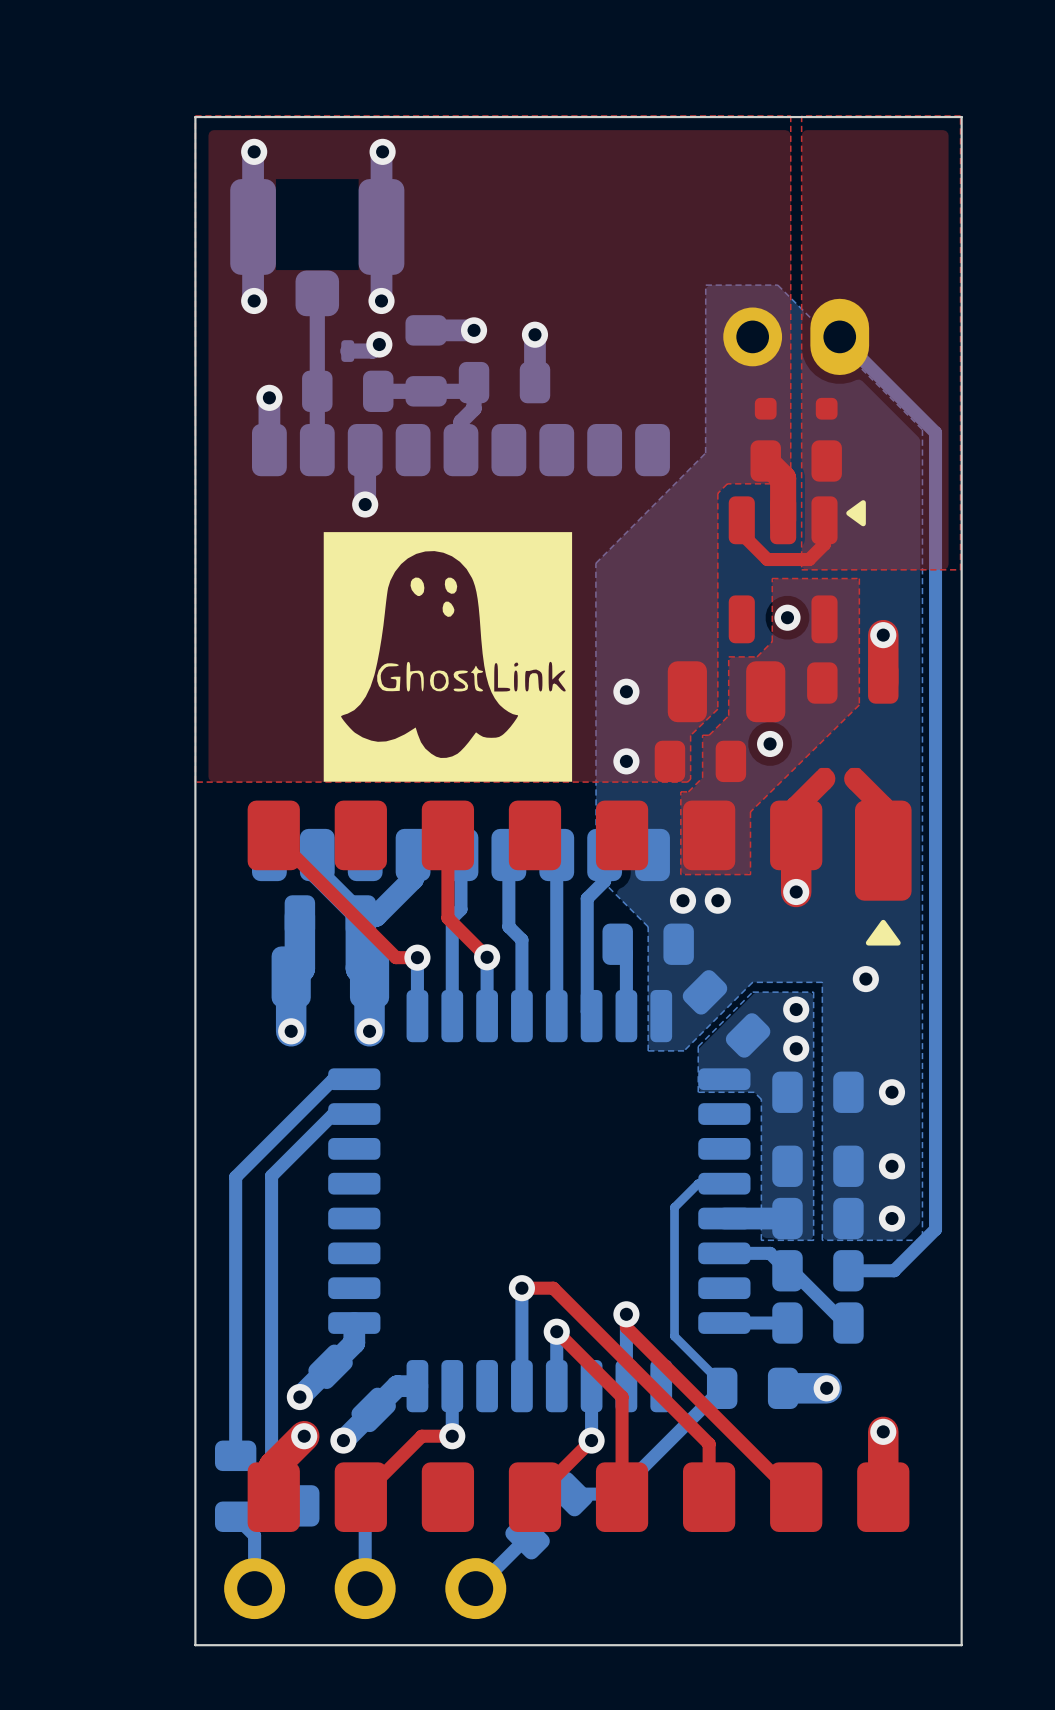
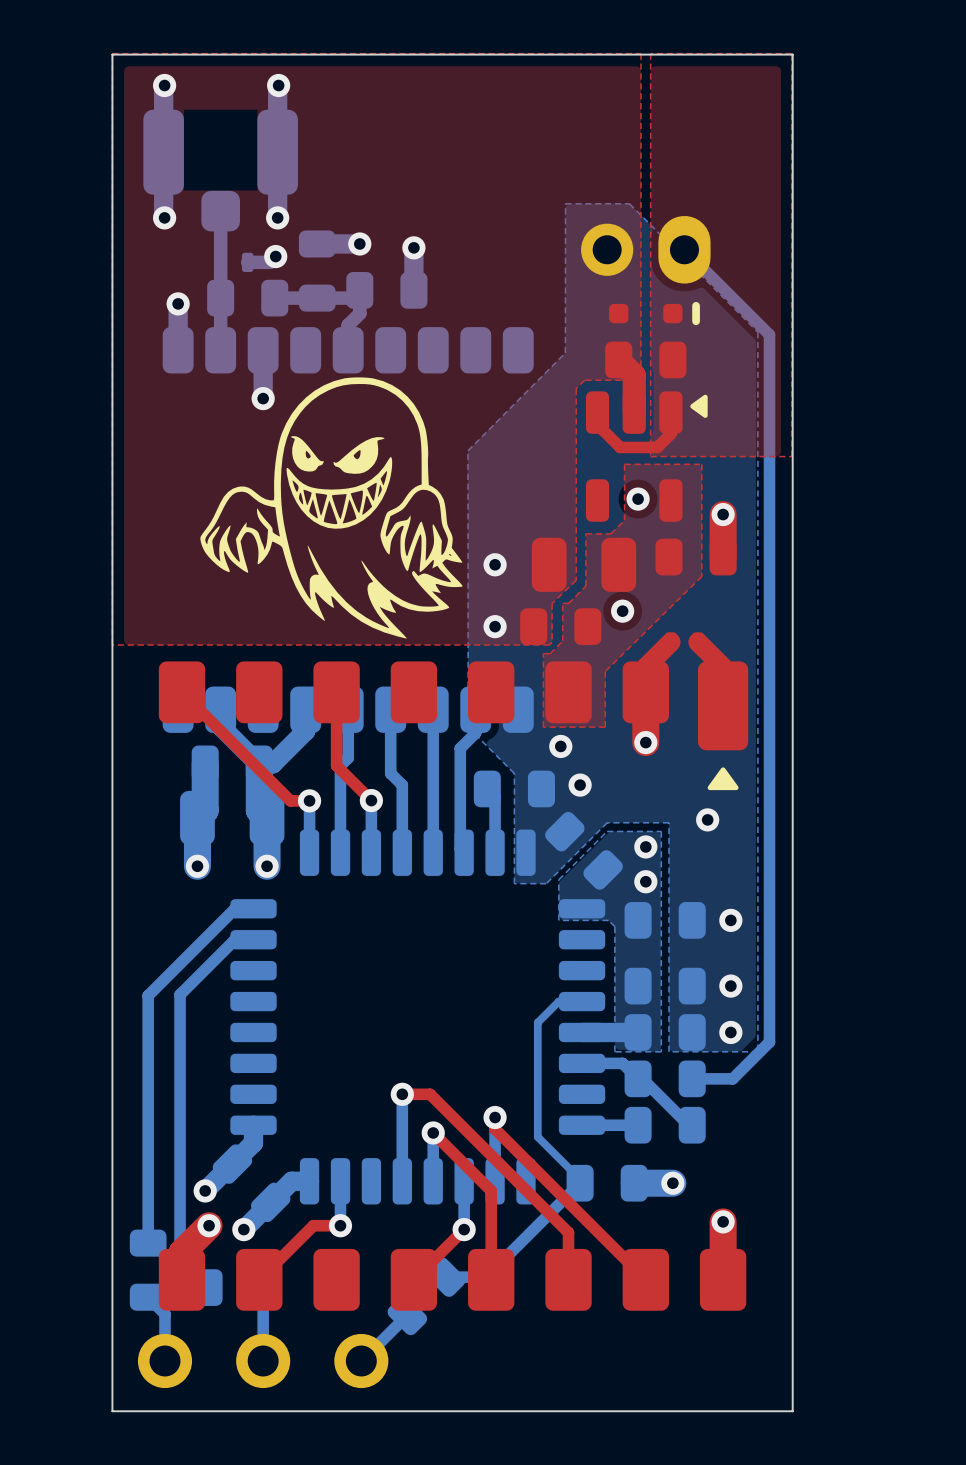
line: none -> (696, 305) (696, 321)
drawing shape: [323, 532, 573, 782] -> [200, 377, 463, 639]
via: none -> (560, 746)
via: (683, 900) -> none
via: (717, 900) -> none
via: none -> (580, 785)

